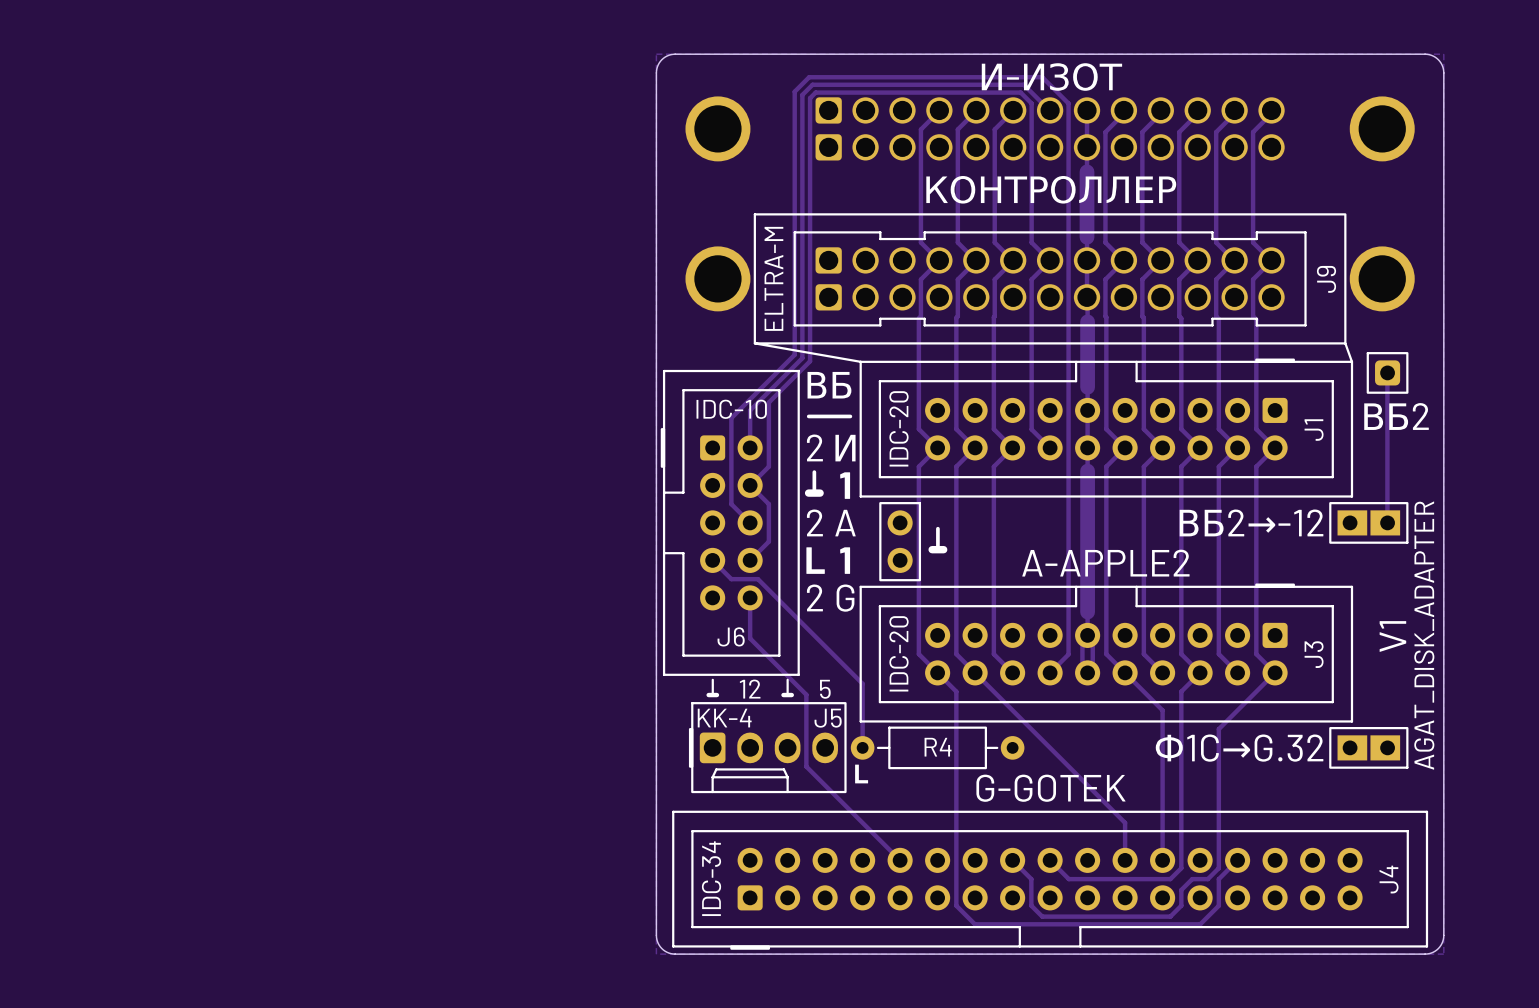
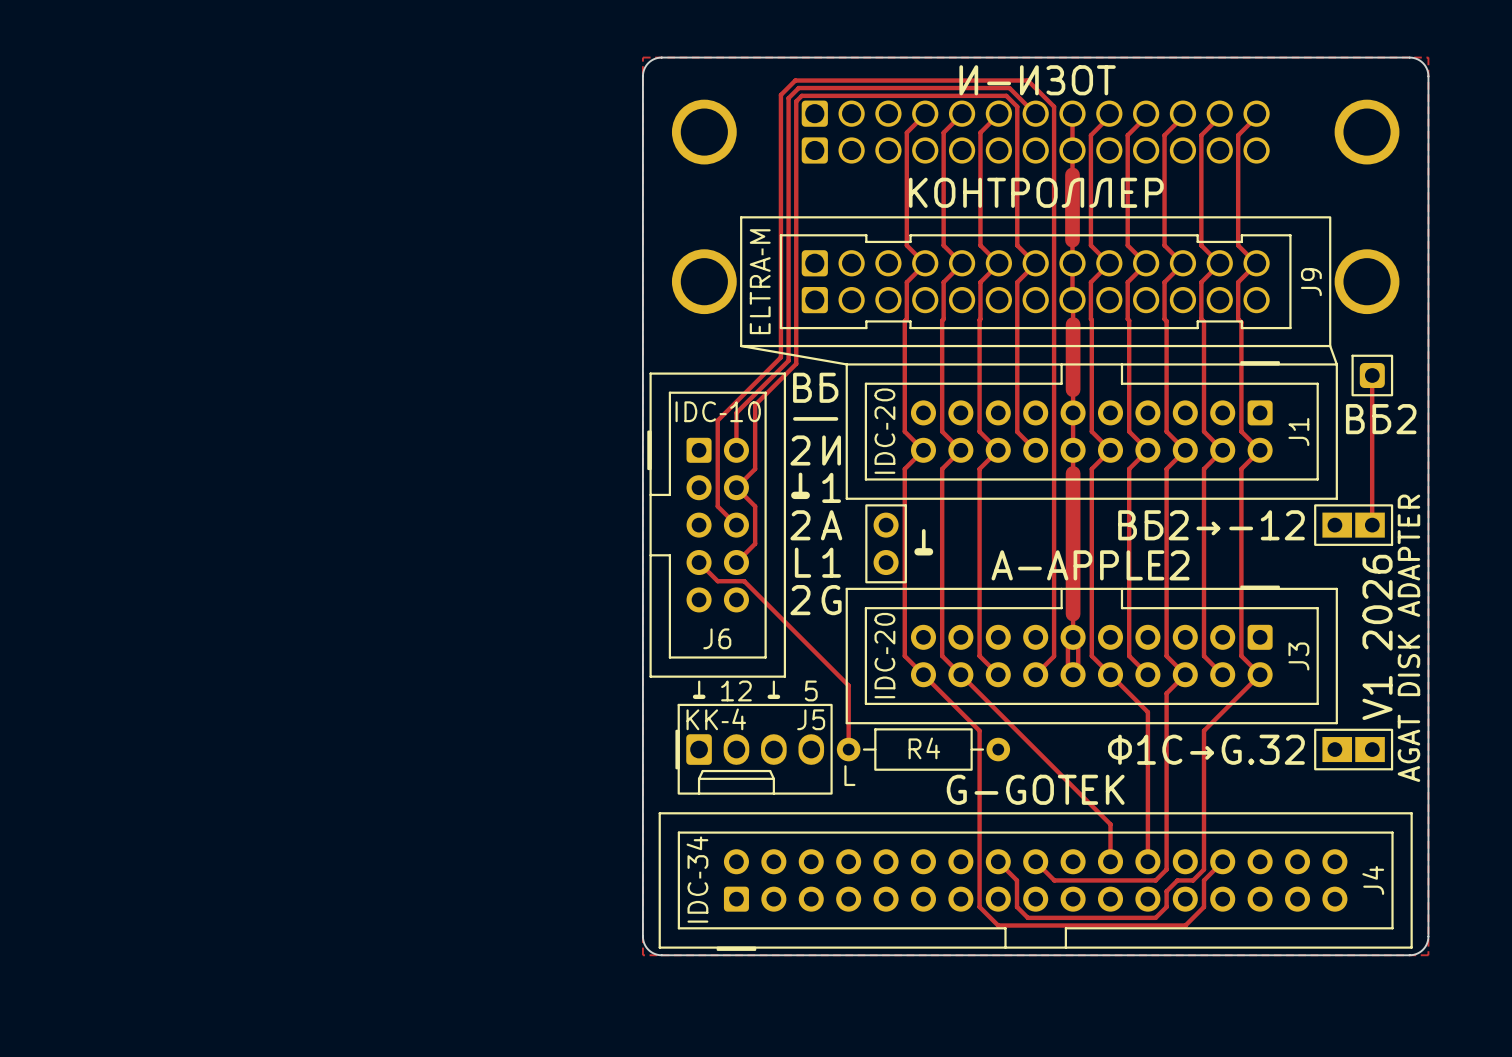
track: (750, 597) (750, 638) (806, 694) (806, 766) (900, 860) -> none
text: AGAT_DISK_ADAPTER (1424, 635) -> AGAT DISK ADAPTER (1408, 638)
text: V1 (1392, 636) -> V1 2026 (1377, 637)
J5 footprint: [688, 678, 847, 794] -> [675, 703, 833, 795]
line: none -> (773, 681) (773, 696)
track: (956, 691) (956, 905) (974, 924) (1012, 924) -> (942, 693) (979, 730) (979, 906) (998, 925)

